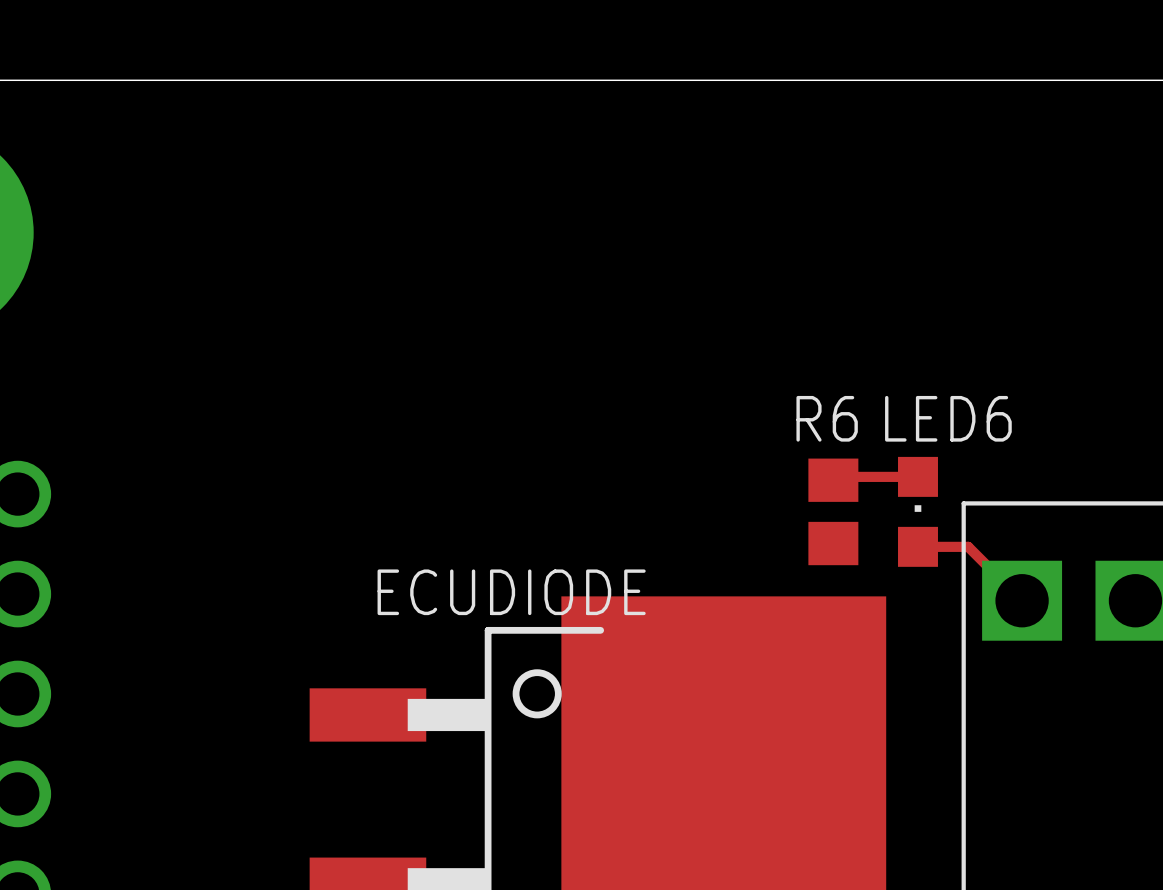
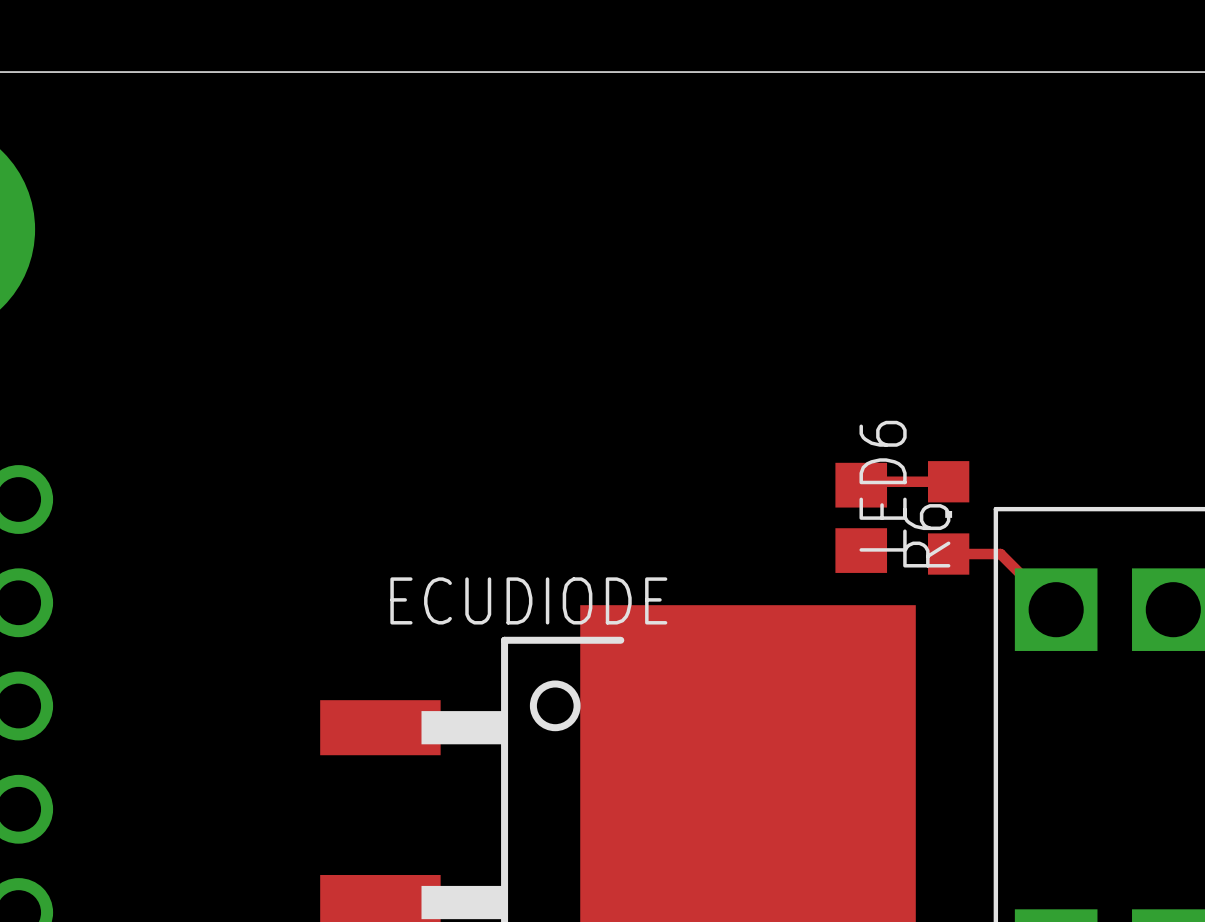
R6 name rotation: 0° (827, 418) -> 90° counterclockwise (926, 535)
R6 name position: R6 (827, 418) -> R6 (926, 535)
LED6 name rotation: 0° (948, 418) -> 90° counterclockwise (883, 486)

